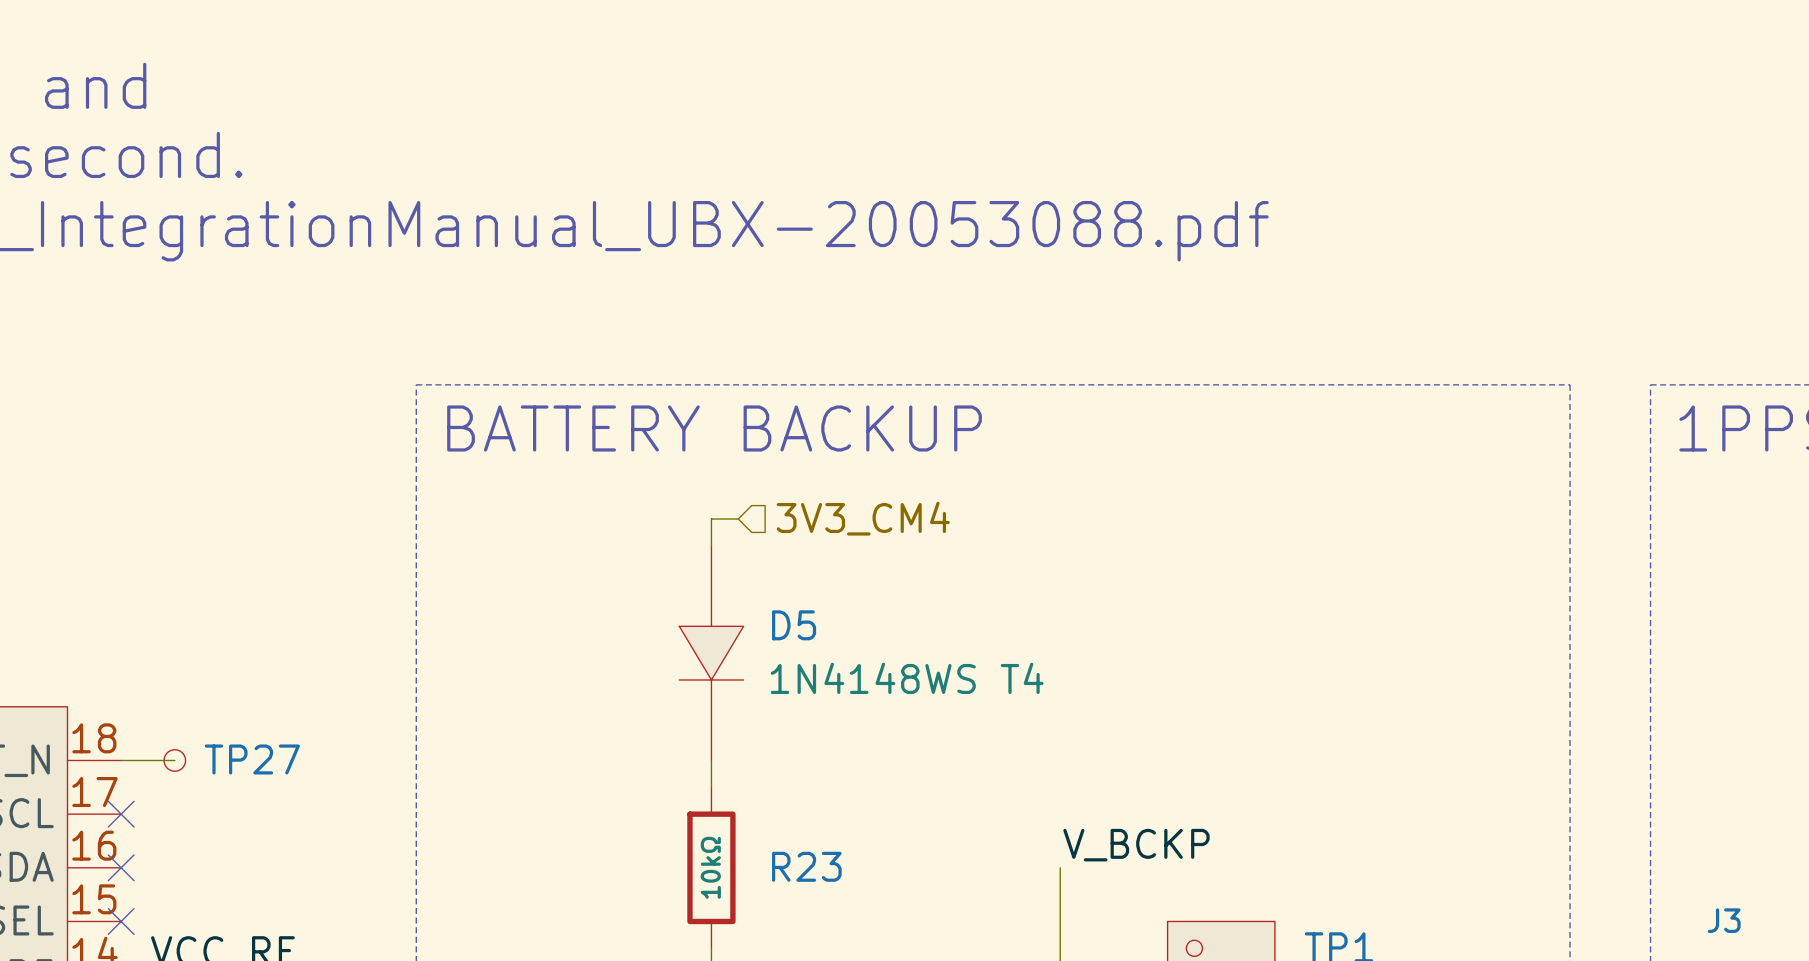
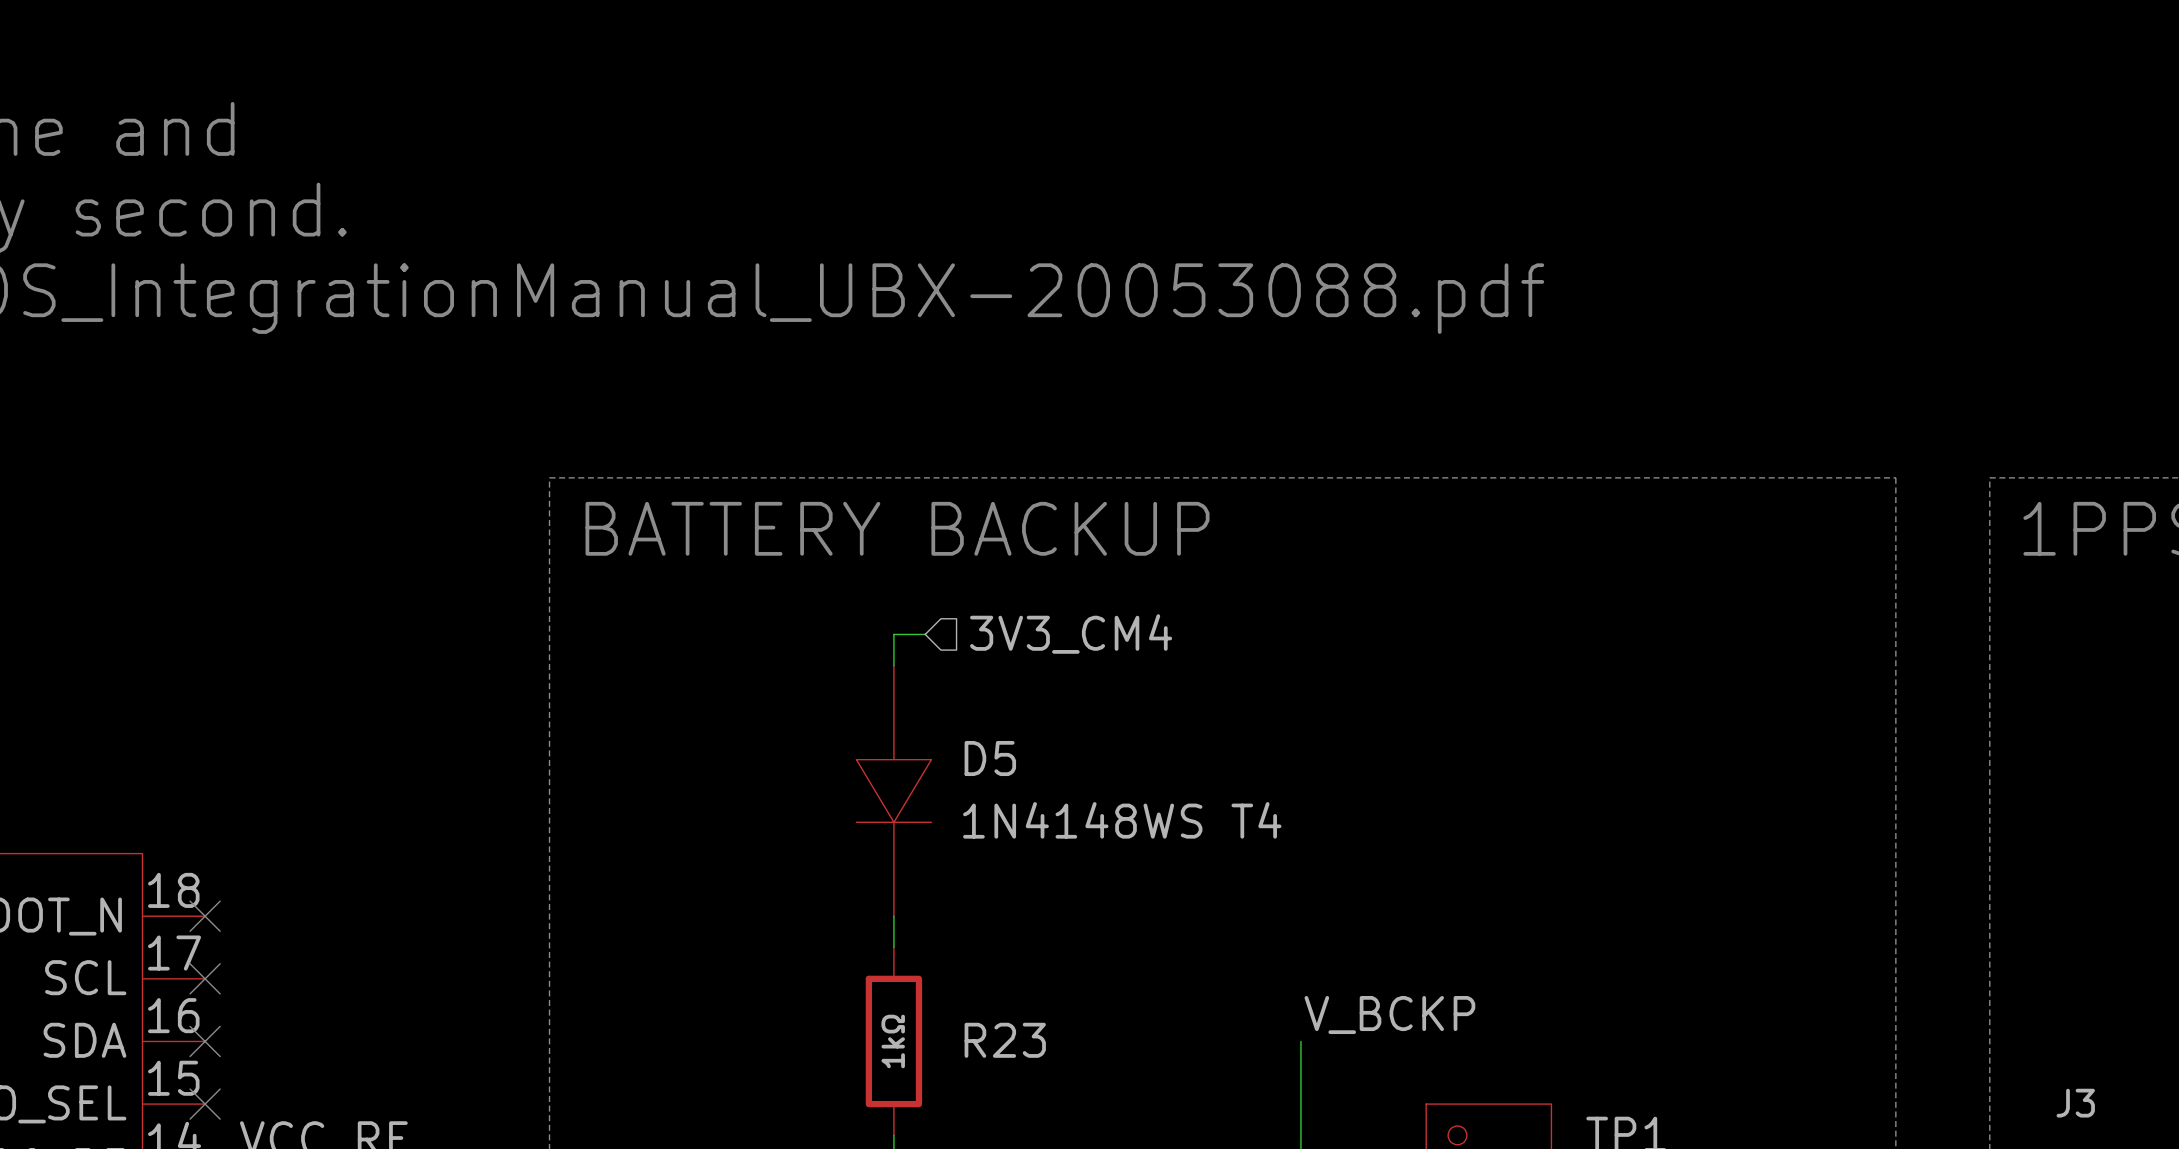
wire: (121, 760) (174, 760) -> none
no-connect mark: none -> (205, 916)
TP27: (174, 760) -> none
R23 value: 10kΩ (710, 867) -> 1kΩ (893, 1041)

